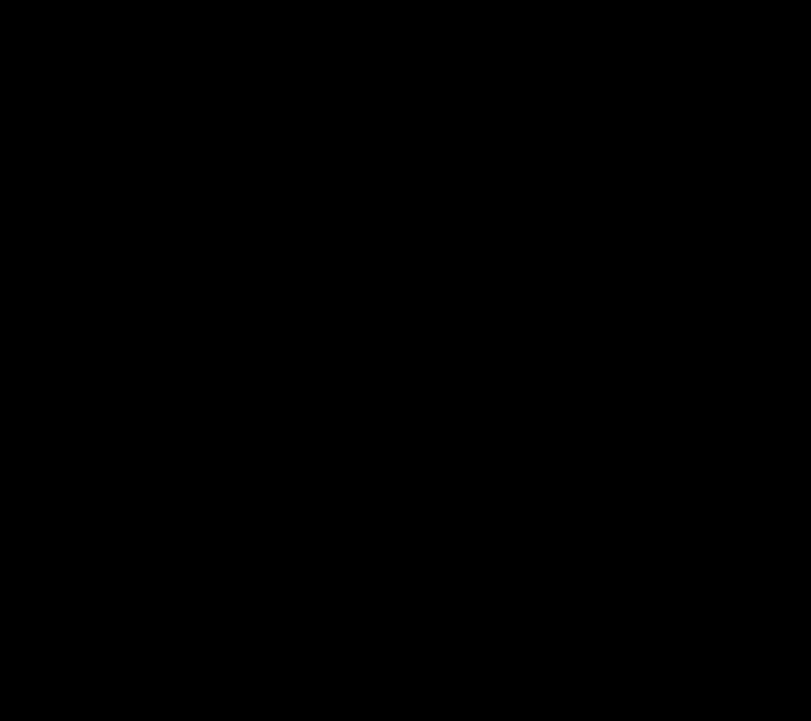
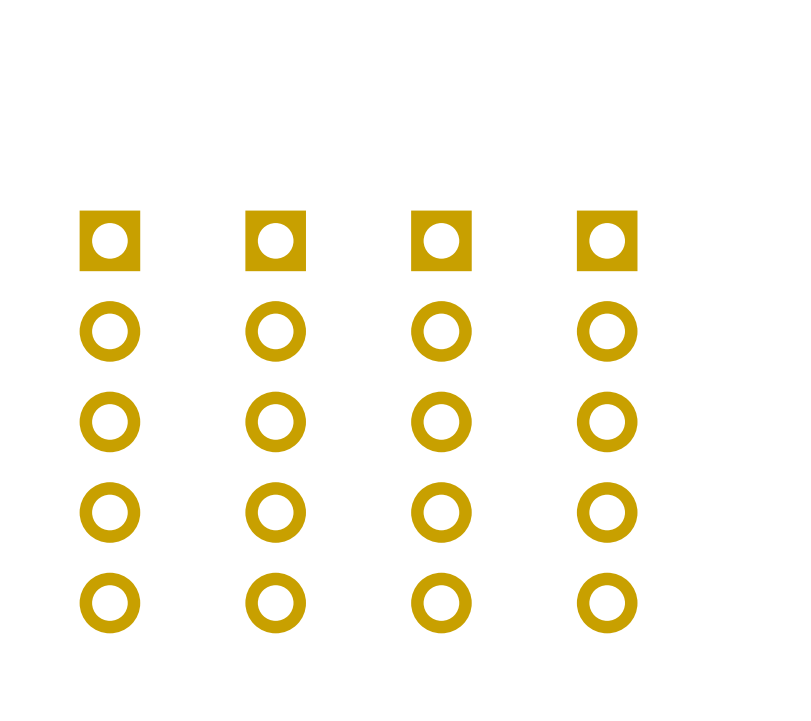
part: none -> (109, 421)
part: none -> (275, 421)
part: none -> (441, 421)
part: none -> (607, 421)

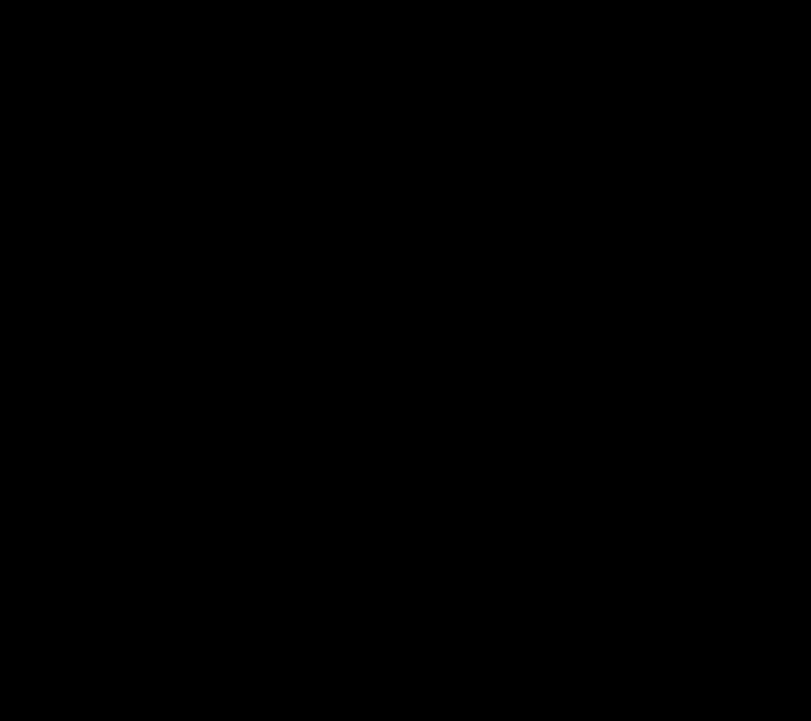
part: (109, 421) -> none
part: (275, 421) -> none
part: (441, 421) -> none
part: (607, 421) -> none

